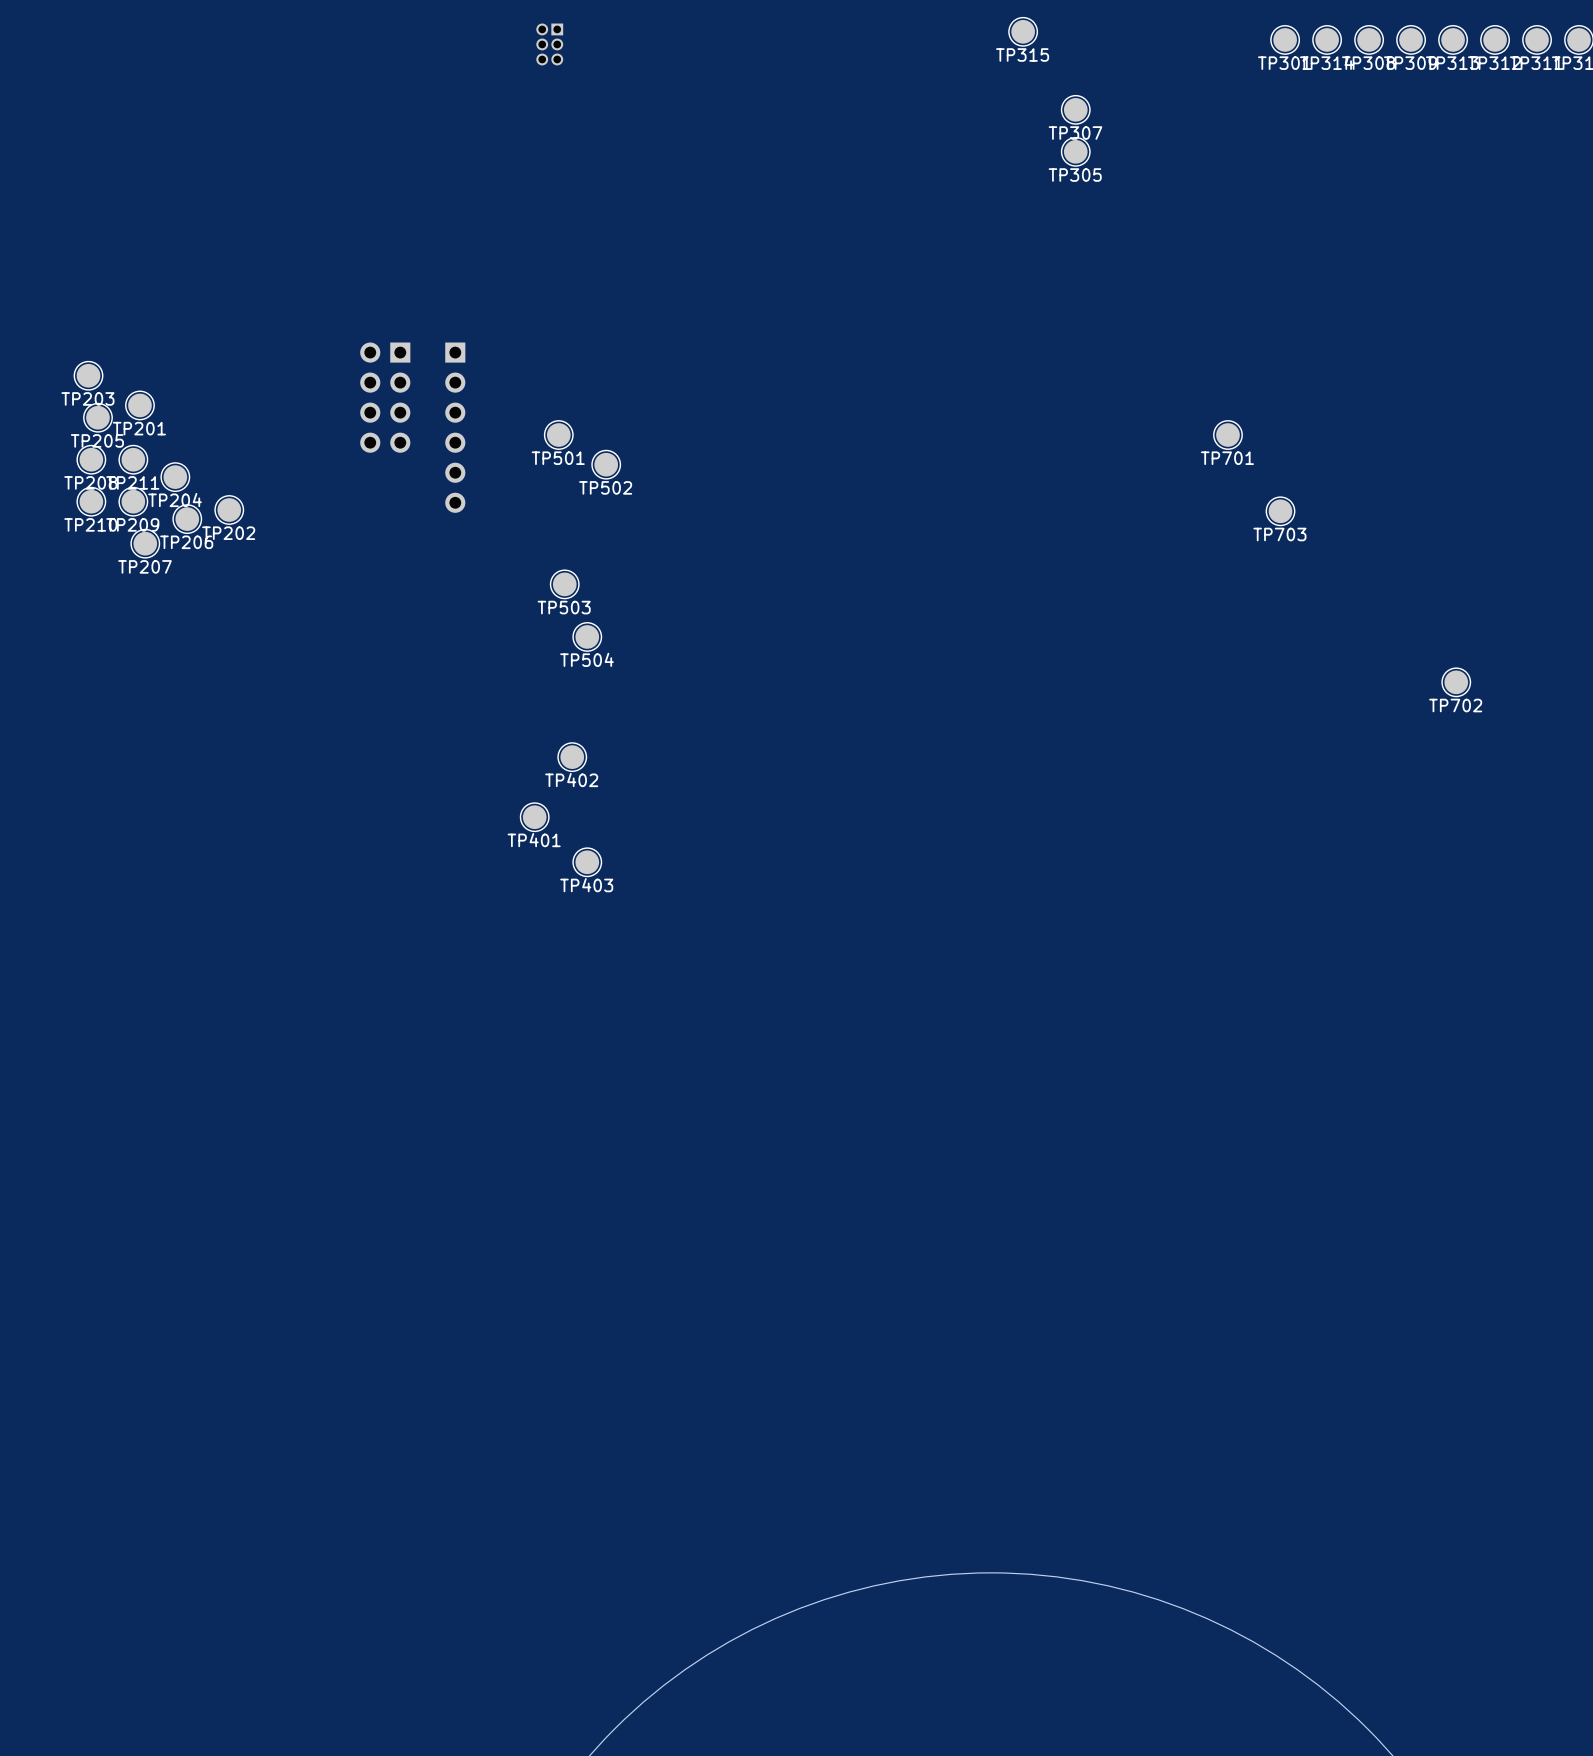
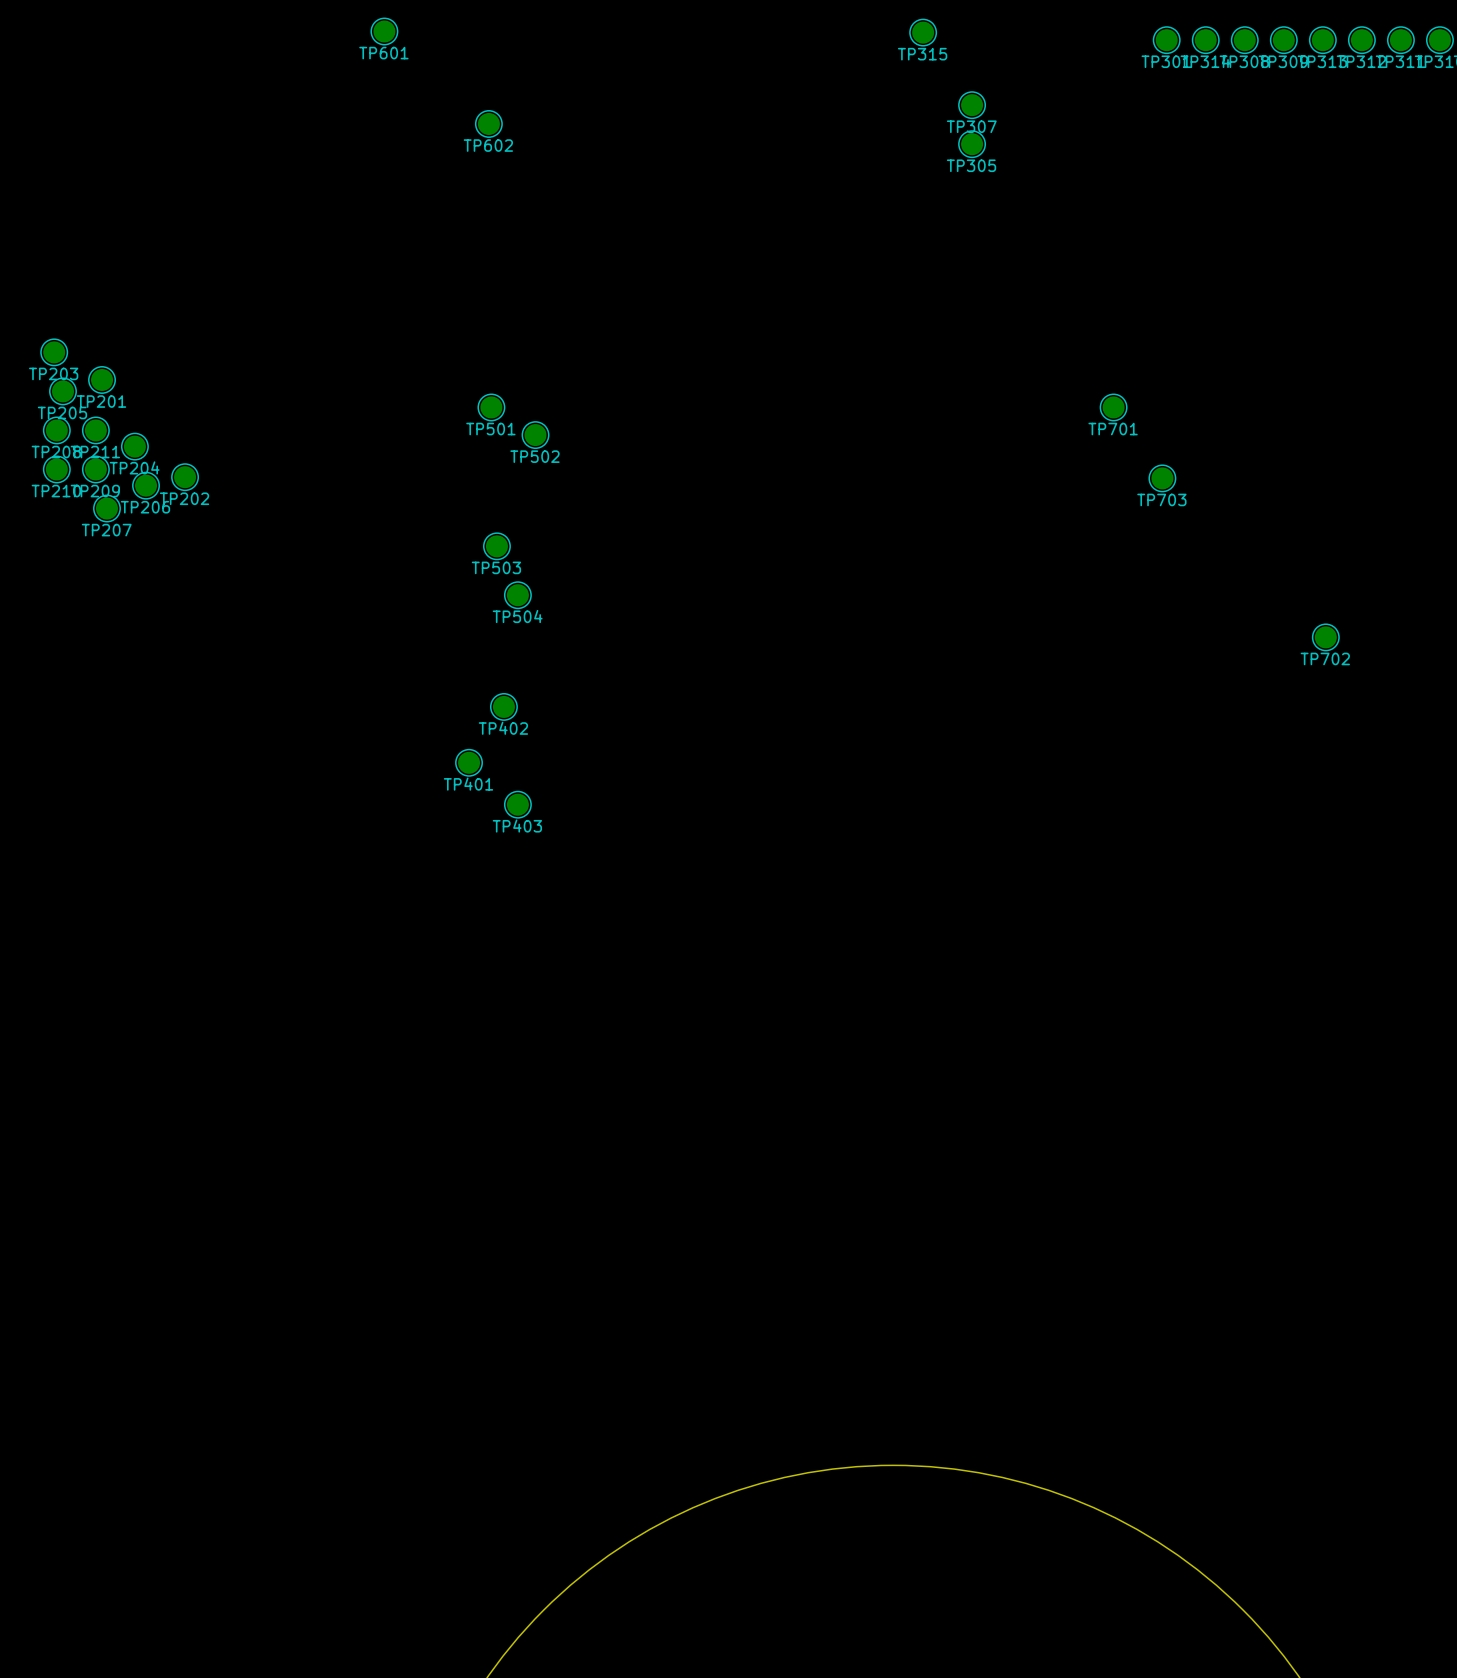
TP601: none -> (384, 31)
part: (549, 44) -> none
TP602: none -> (488, 123)
part: (385, 397) -> none
part: (455, 427) -> none

